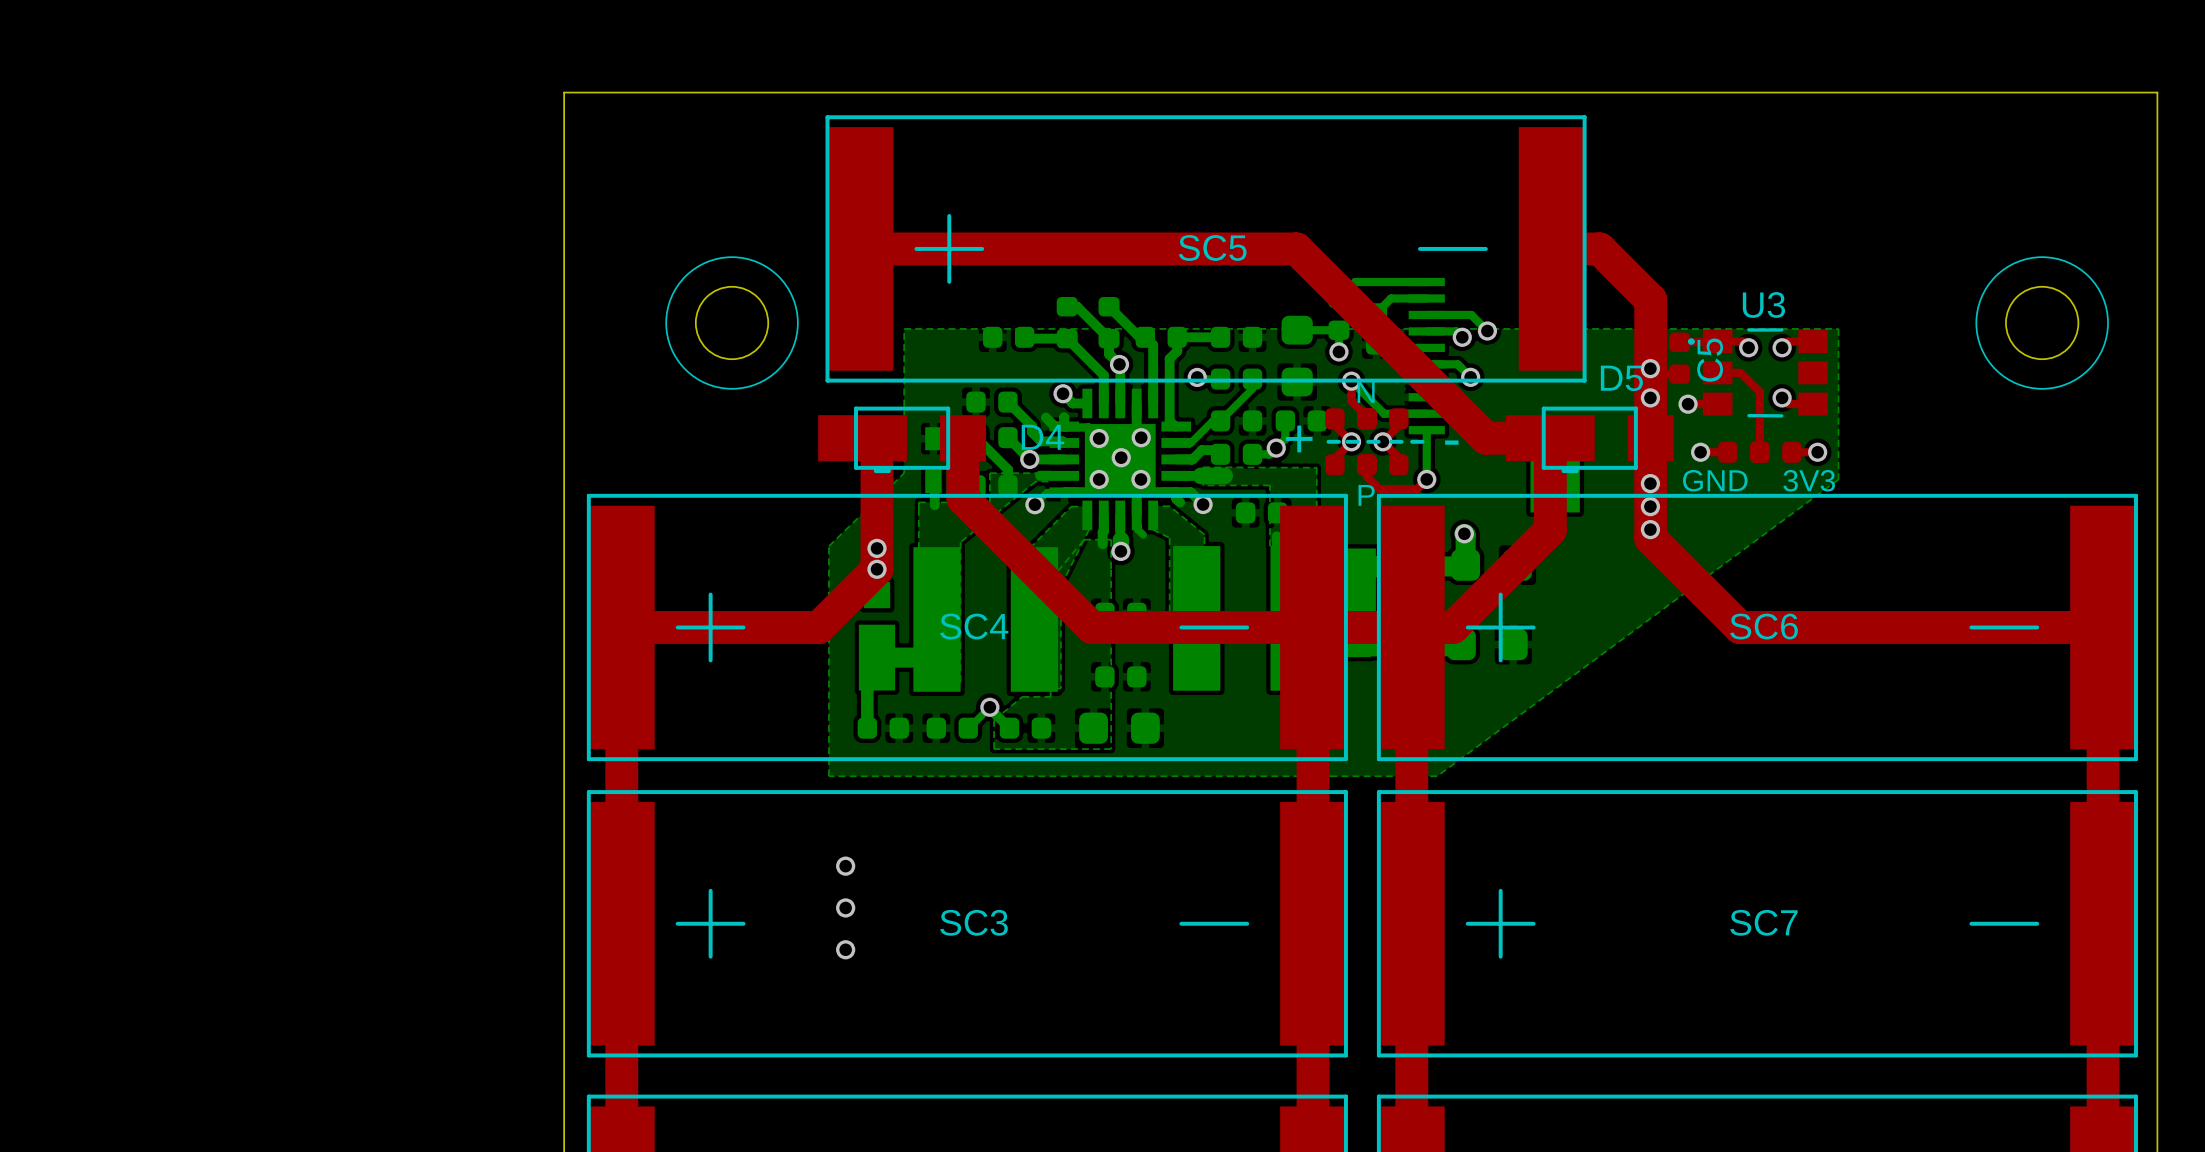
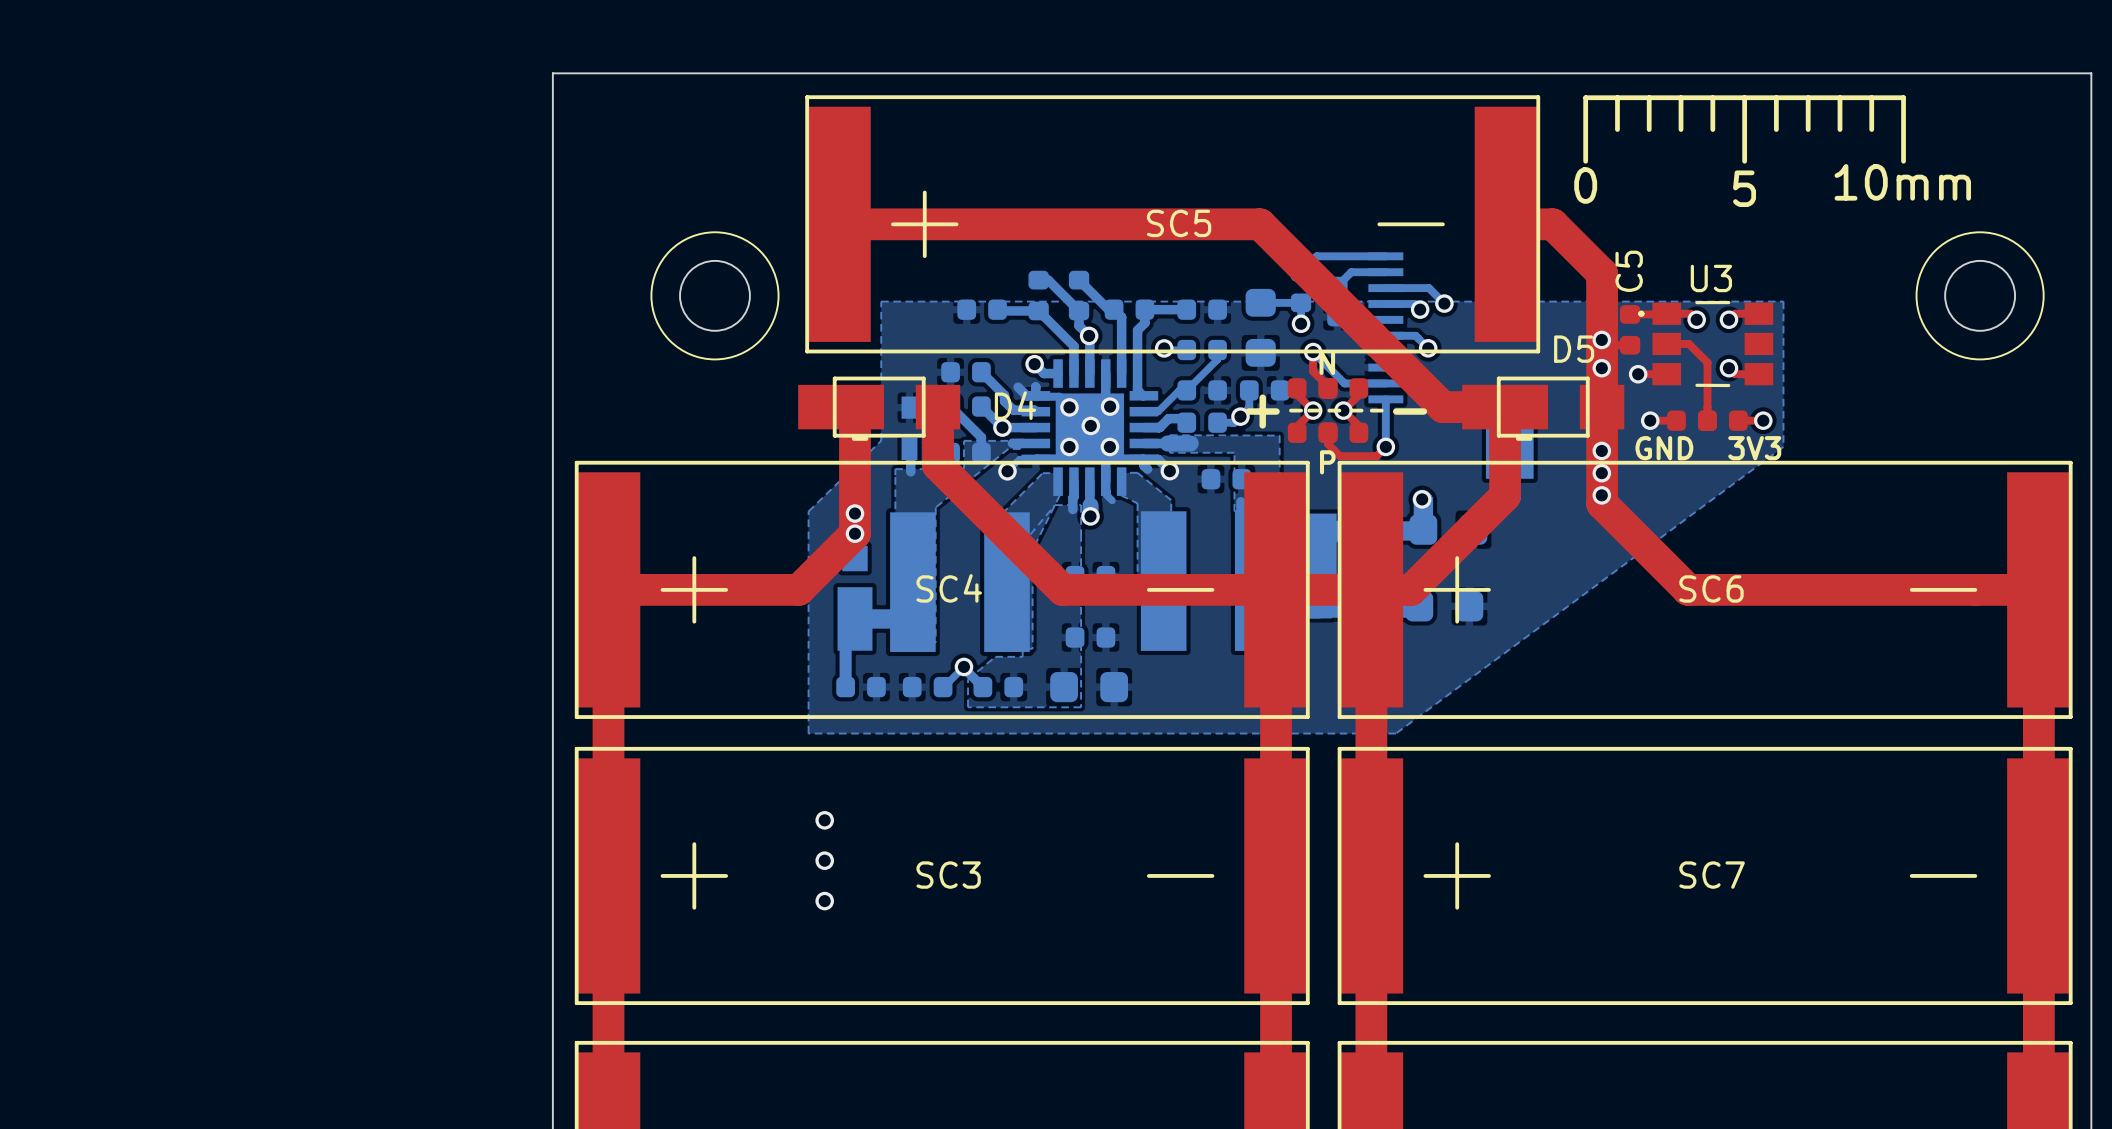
drawing: none -> [1583, 95, 1906, 164]
C5 name position: C5 (1710, 360) -> C5 (1629, 271)

